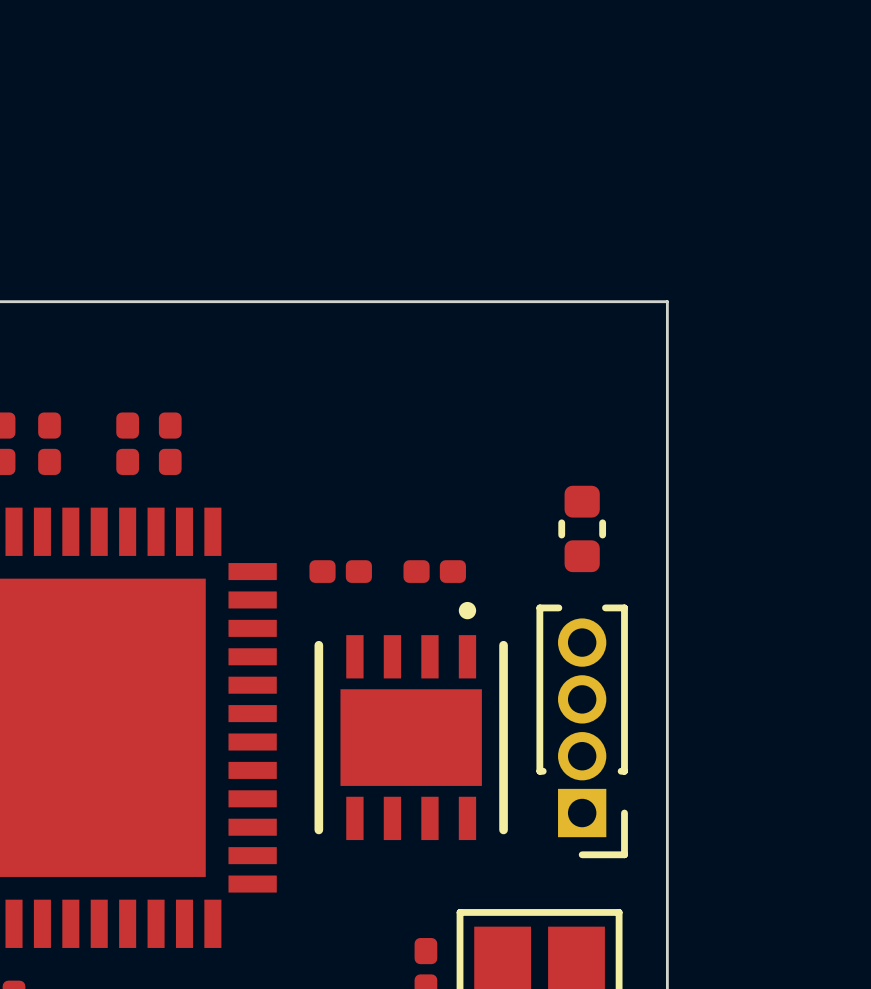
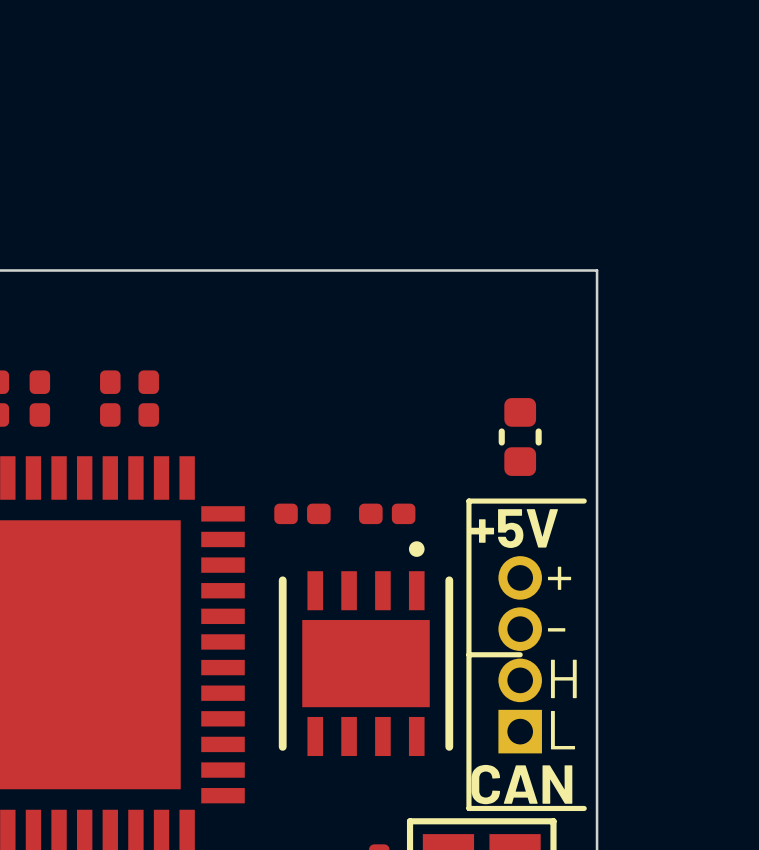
part position: (582, 528) -> (520, 437)
line: none -> (584, 501) (468, 501) (468, 808) (584, 808)
text: none -> +5V (514, 528)
part footprint: [536, 604, 628, 859] -> [498, 556, 542, 754]
text: none -> + (559, 578)
text: none -> - (556, 629)
line: none -> (468, 654) (520, 654)
text: none -> H (563, 678)
text: none -> L (562, 730)
text: none -> CAN (521, 784)

